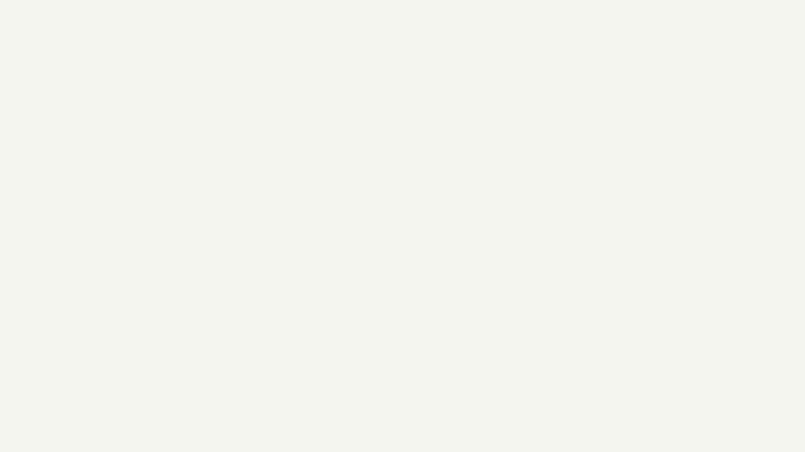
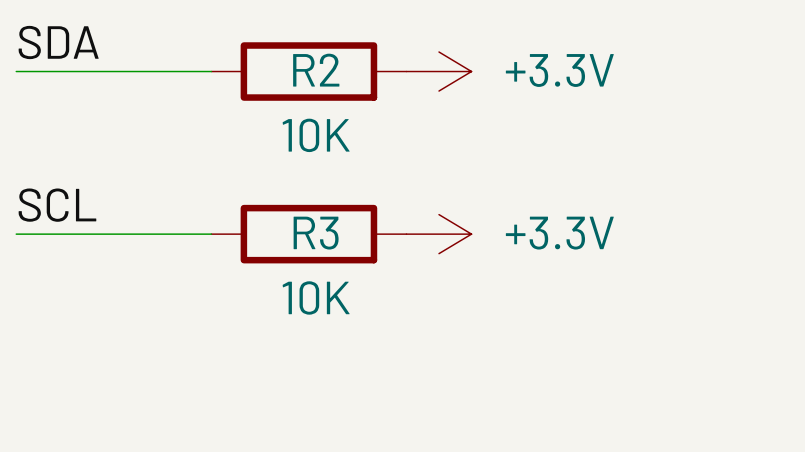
label: none -> SDA (58, 42)
wire: none -> (16, 71) (211, 71)
R2: none -> 10K (308, 71)
power symbol: none -> +3.3V (439, 71)
label: none -> SCL (57, 205)
wire: none -> (16, 234) (211, 234)
R3: none -> 10K (308, 234)
power symbol: none -> +3.3V (439, 234)

